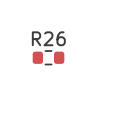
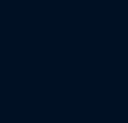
R26: (48, 57) -> none

